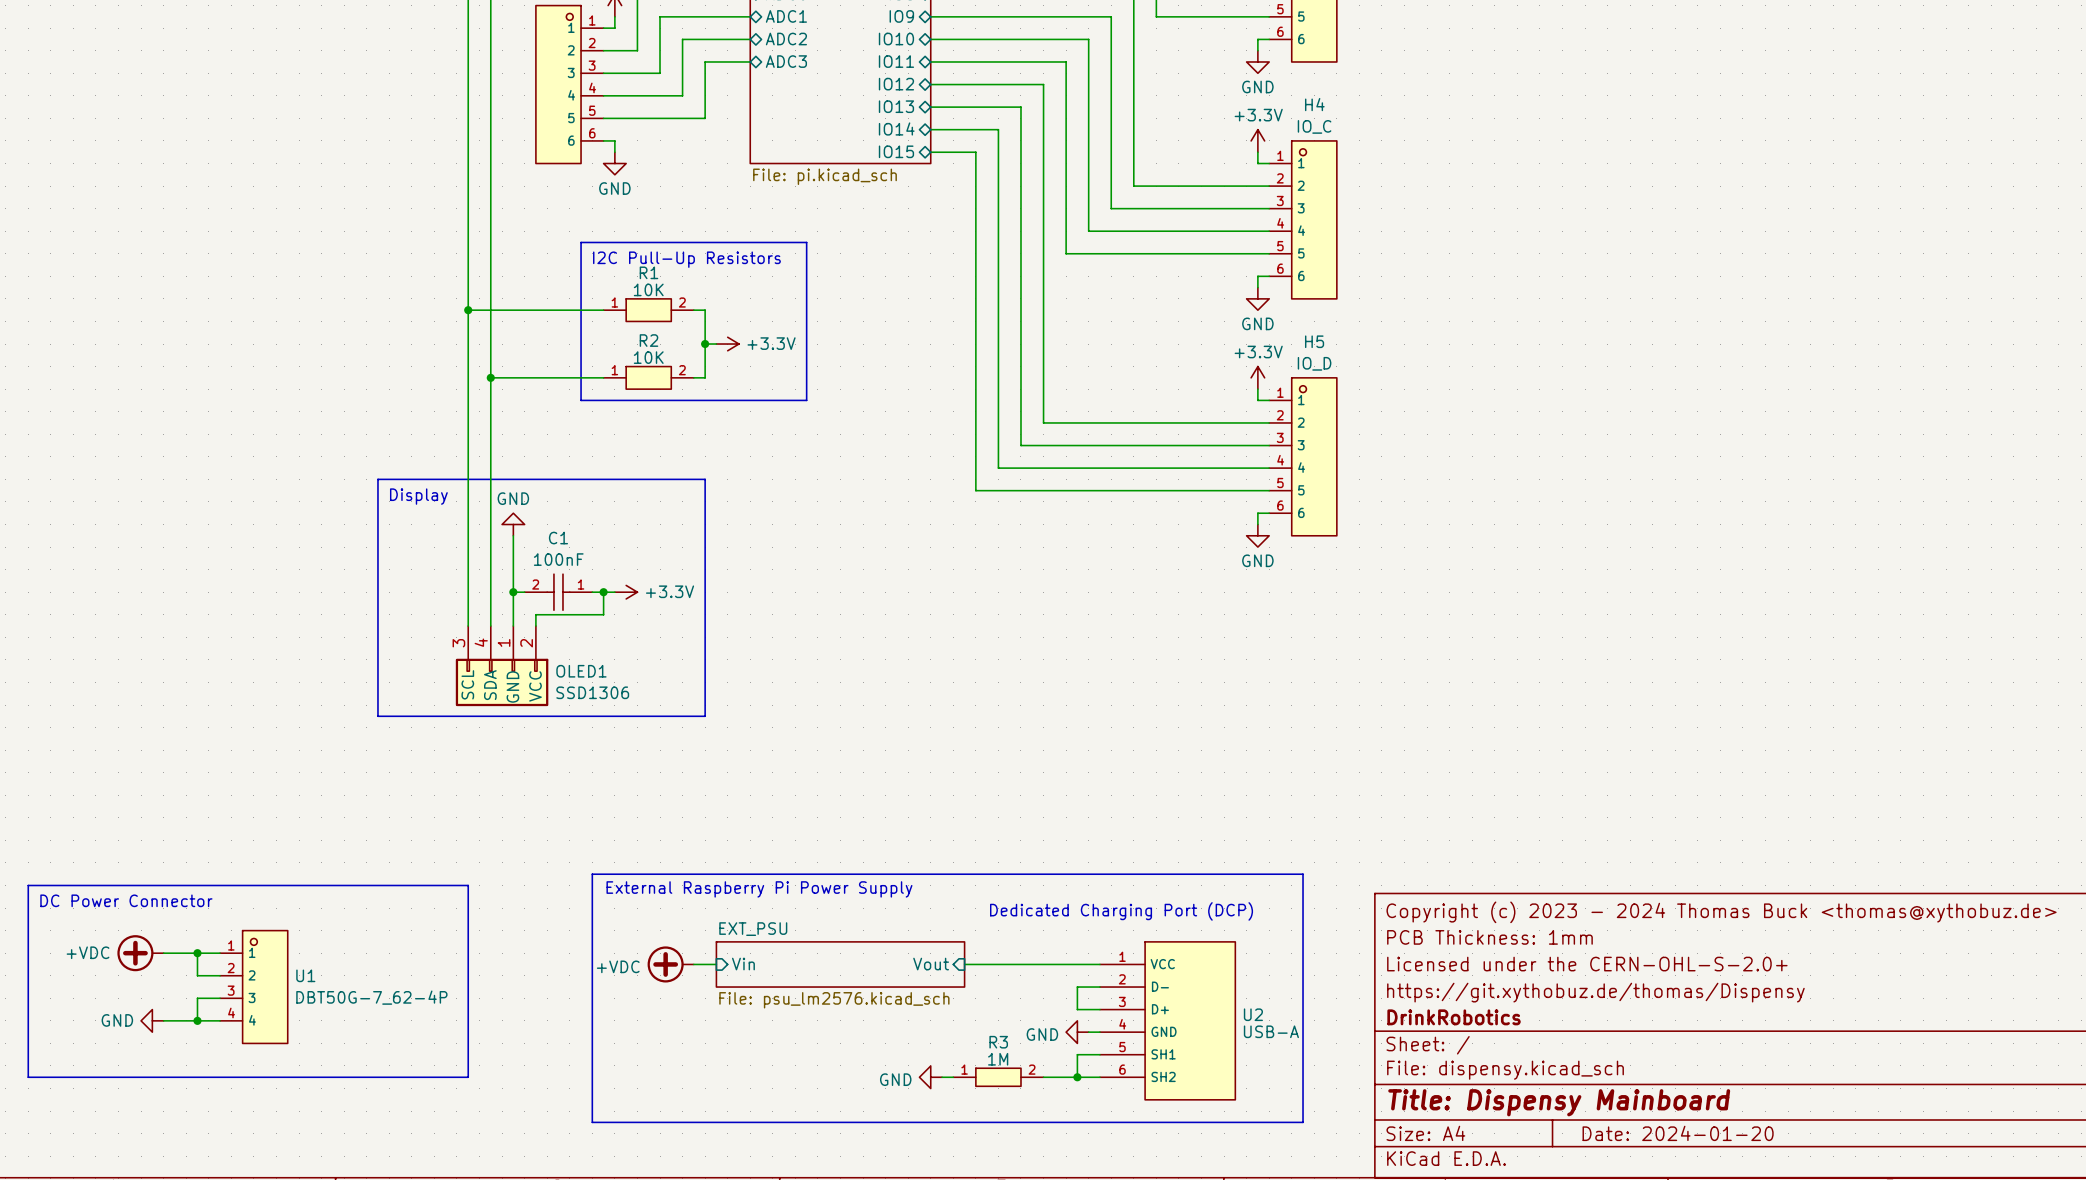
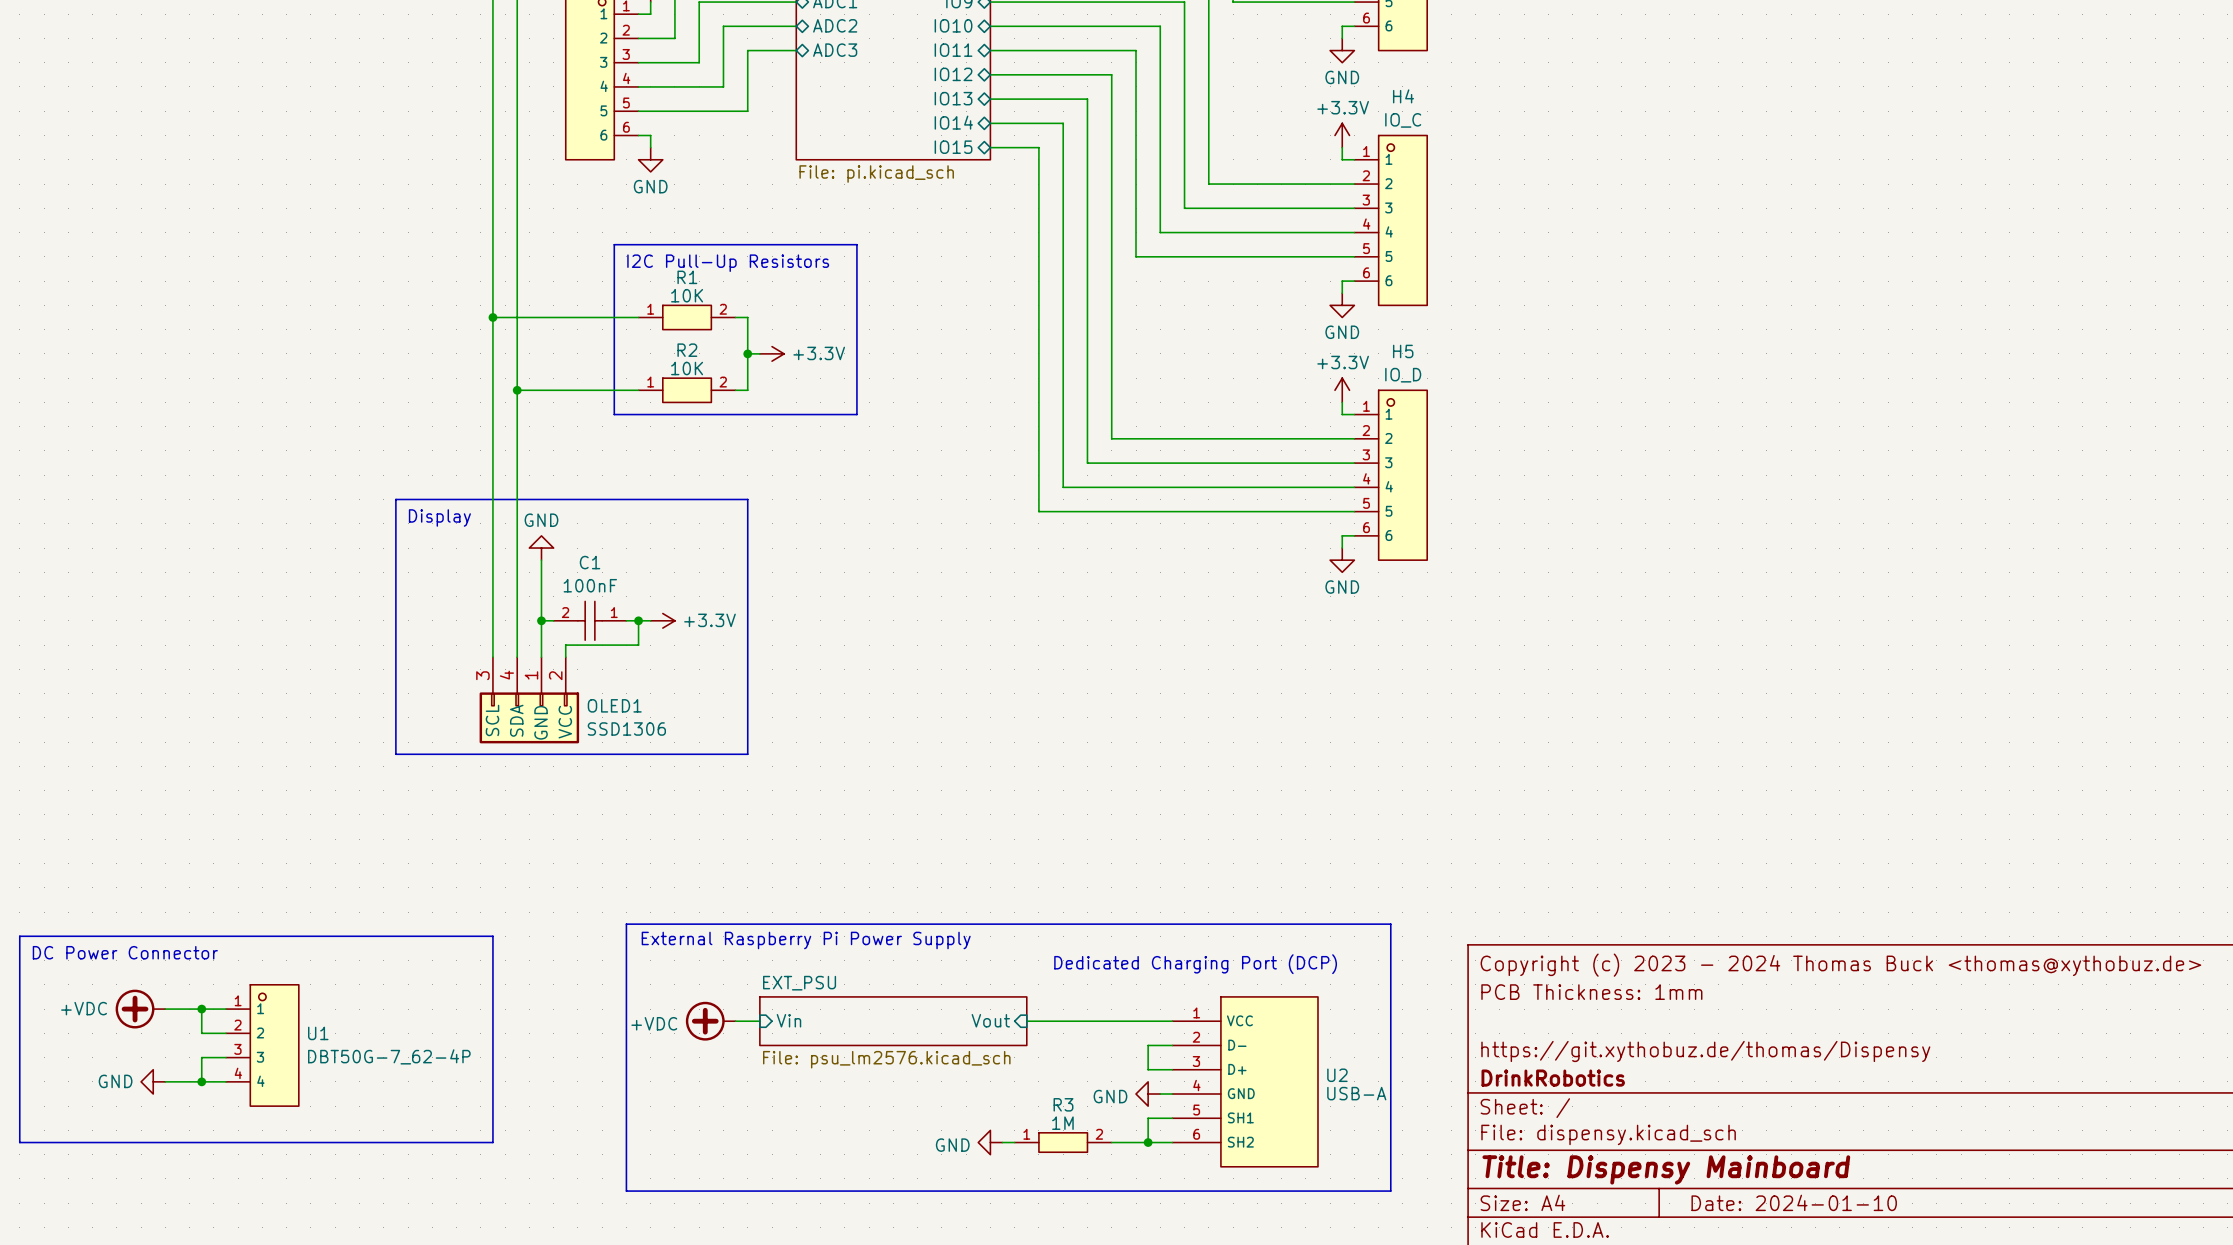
title block: Licensed under the CERN-OHL-S-2.0+ (1587, 964) -> none
title block: Date: 2024-01-20 (1678, 1133) -> Date: 2024-01-10 (1794, 1202)

